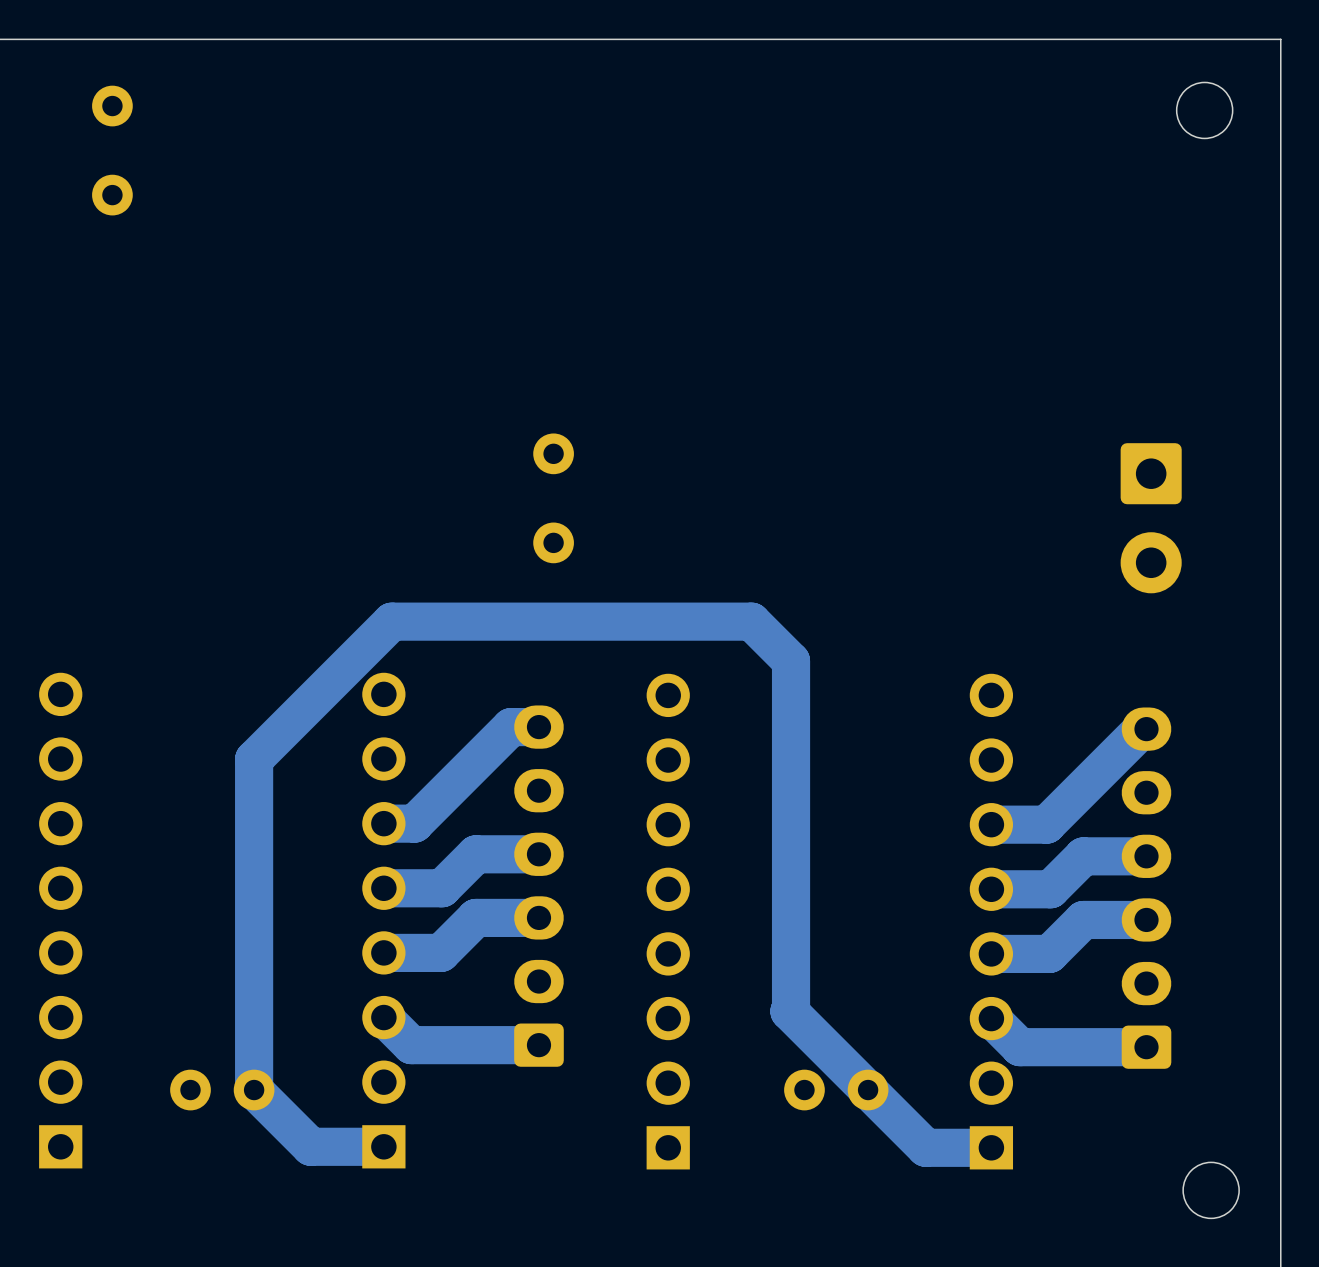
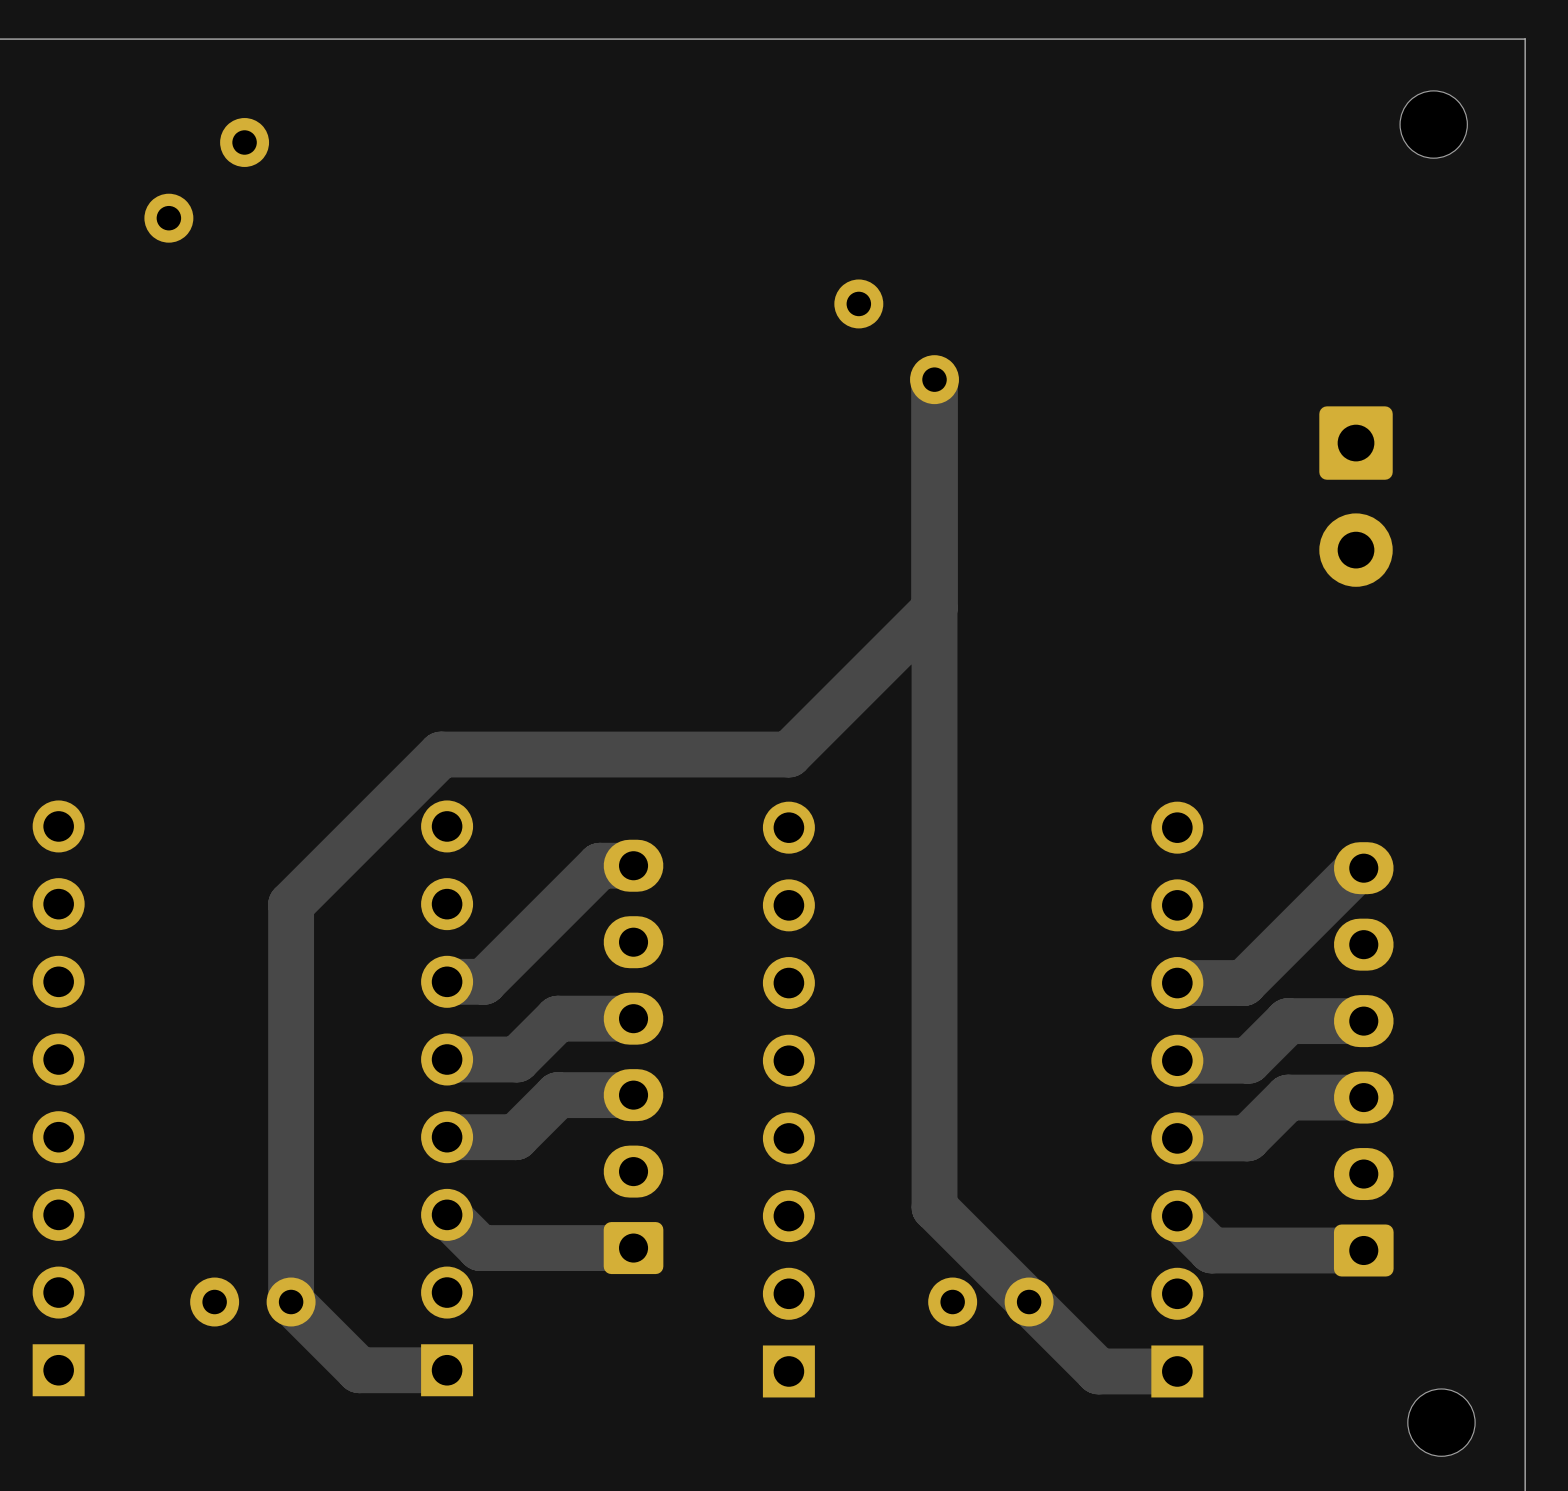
part: (112, 150) -> none
part: none -> (206, 180)
part: none -> (896, 341)
track: none -> (934, 379) (934, 1207)
part: (553, 498) -> none
part position: (1151, 518) -> (1356, 496)
track: (378, 634) (391, 621) (751, 621) (791, 661) (791, 1009) (789, 1011) -> (441, 754) (788, 754) (934, 608)

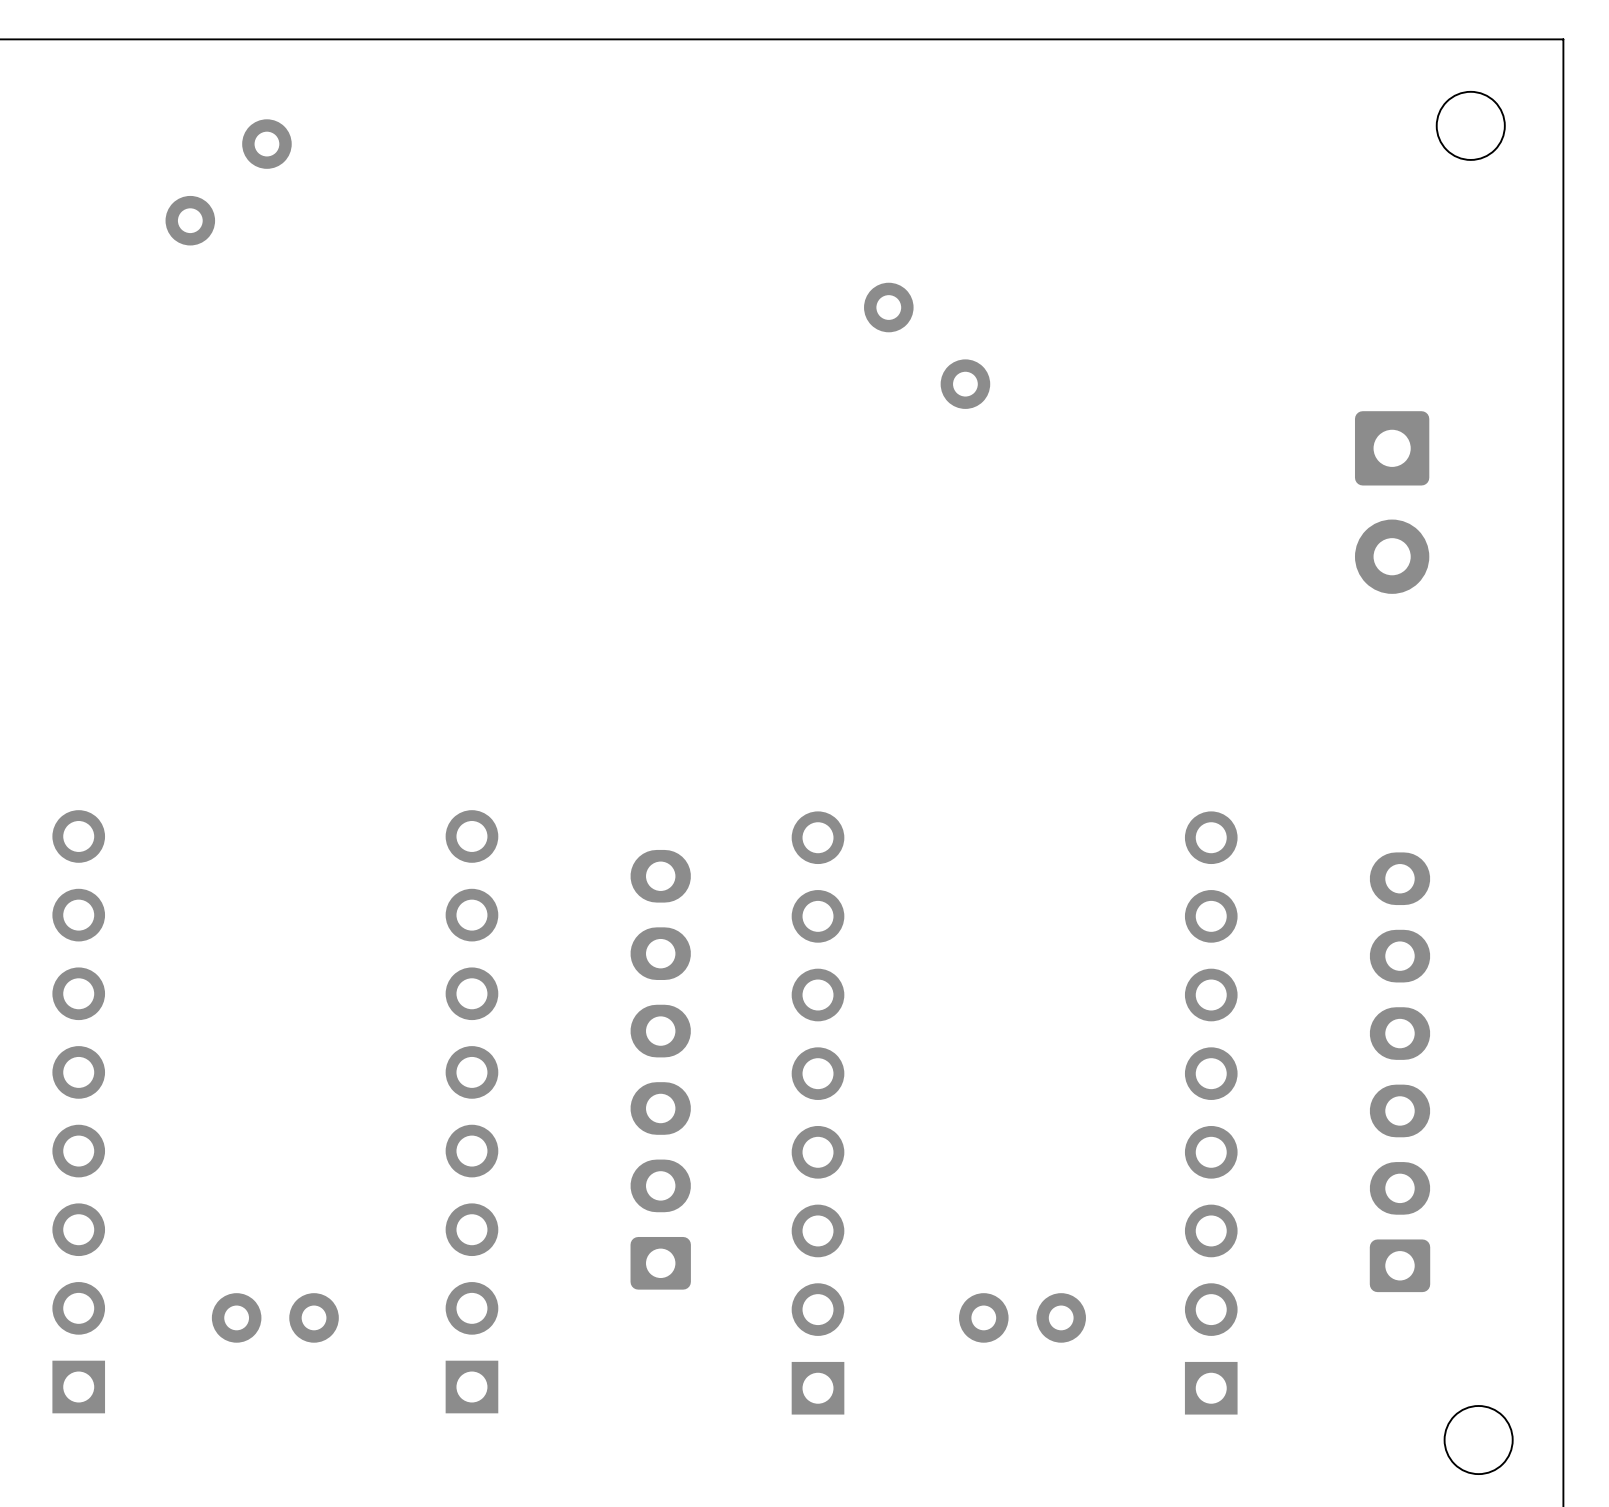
track: (934, 379) (934, 1207) (1098, 1371) (1177, 1371) -> none
track: (934, 608) (788, 754) (441, 754) (291, 904) (291, 1302) (359, 1370) (447, 1370) -> none
track: (633, 865) (599, 865) (483, 981) (447, 981) -> none
track: (1363, 868) (1358, 868) (1243, 983) (1177, 983) -> none
track: (633, 1018) (557, 1018) (516, 1059) (447, 1059) -> none
track: (1363, 1021) (1288, 1021) (1248, 1060) (1177, 1060) -> none
track: (633, 1095) (557, 1095) (515, 1137) (447, 1137) -> none
track: (1363, 1097) (1288, 1097) (1247, 1138) (1177, 1138) -> none
track: (447, 1214) (480, 1248) (633, 1248) -> none
track: (1177, 1216) (1211, 1250) (1363, 1250) -> none

